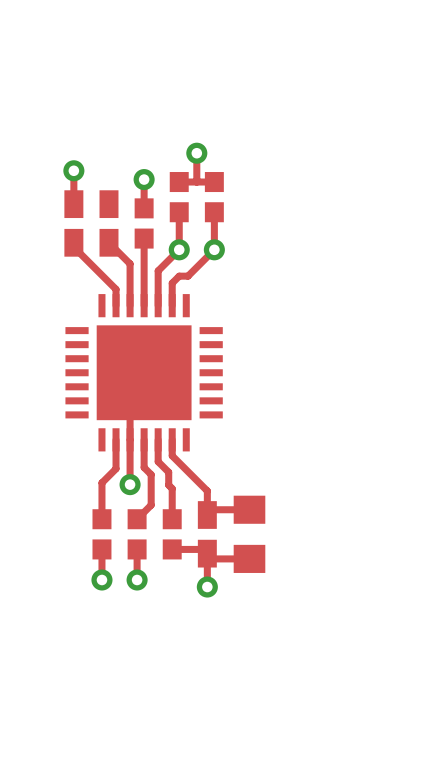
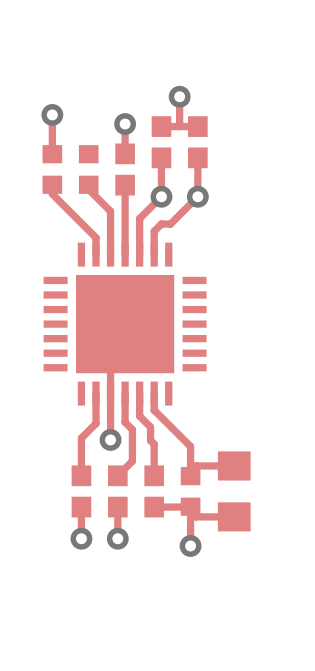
part footprint: [64, 190, 84, 257] -> [42, 145, 63, 194]
part footprint: [99, 190, 119, 257] -> [78, 145, 99, 194]
part footprint: [197, 501, 217, 568] -> [180, 467, 201, 516]

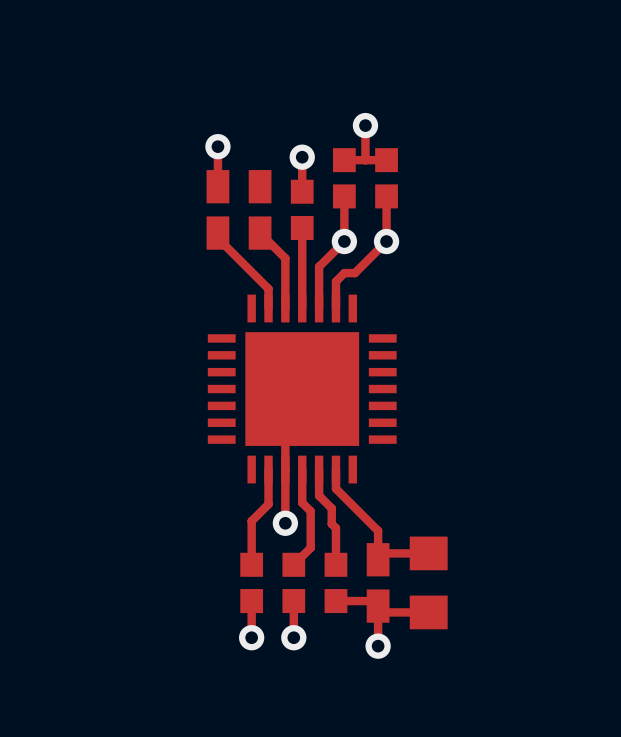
part footprint: [42, 145, 63, 194] -> [206, 170, 230, 250]
part footprint: [78, 145, 99, 194] -> [248, 170, 272, 250]
part footprint: [180, 467, 201, 516] -> [366, 543, 390, 623]

